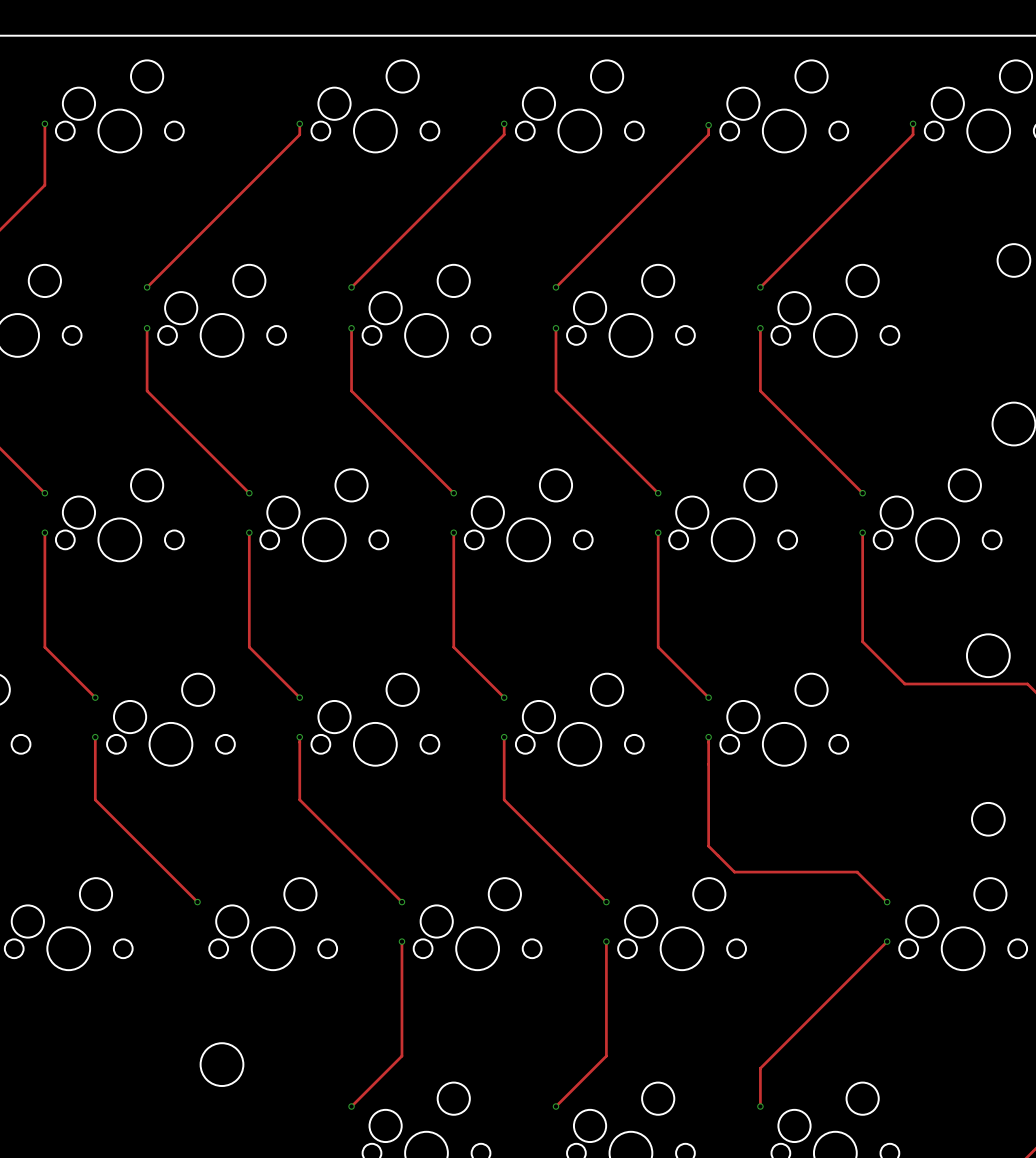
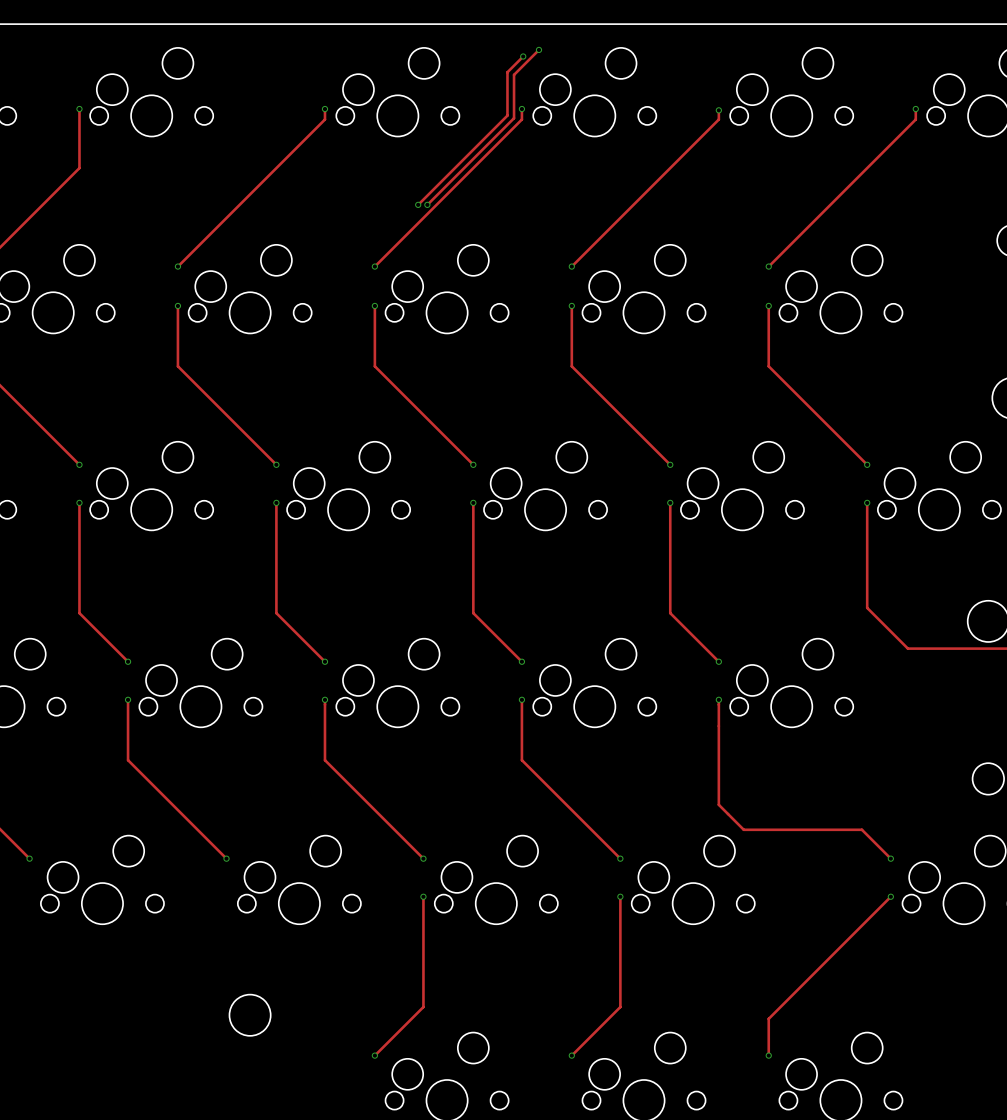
track: none -> (538, 49) (514, 74) (514, 118) (427, 204)
via: none -> (538, 49)
track: none -> (523, 56) (507, 72) (507, 115) (418, 204)
via: none -> (523, 56)
via: none -> (418, 204)
via: none -> (427, 204)

